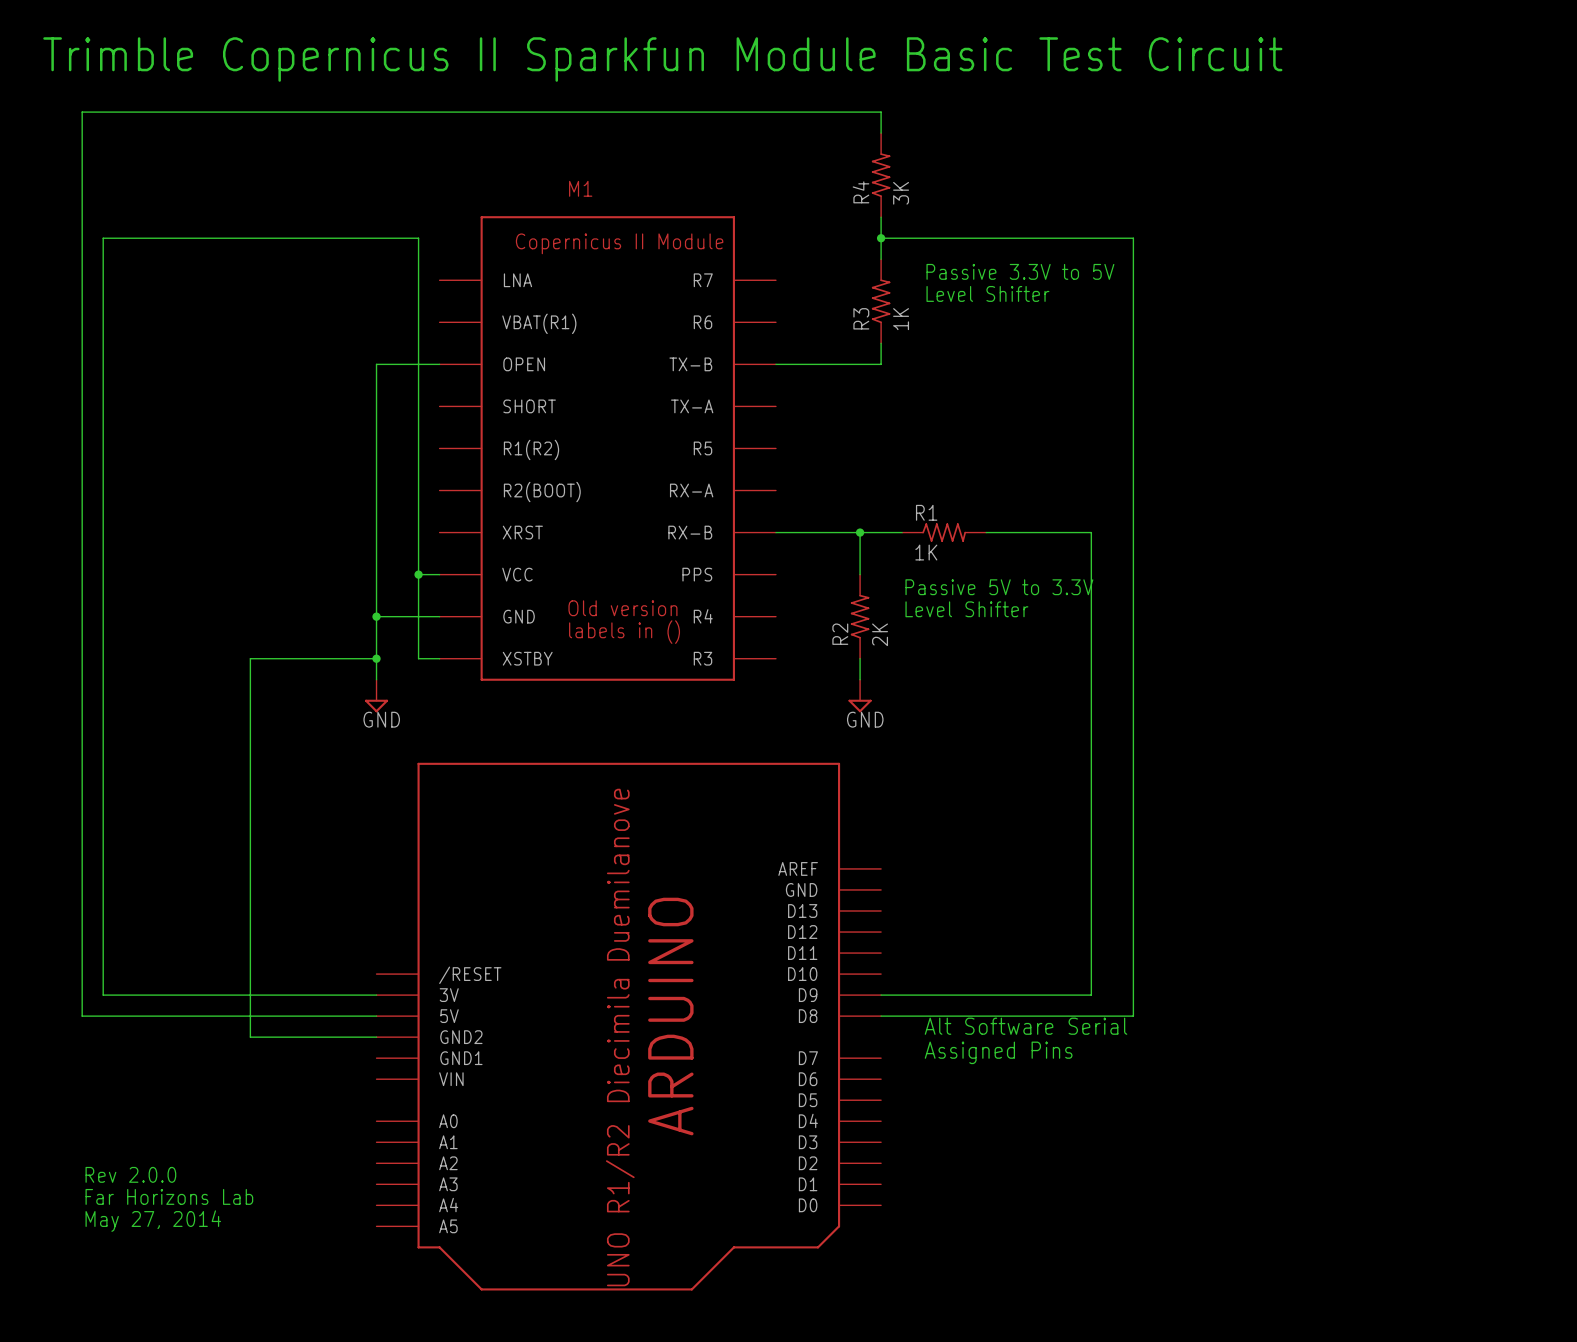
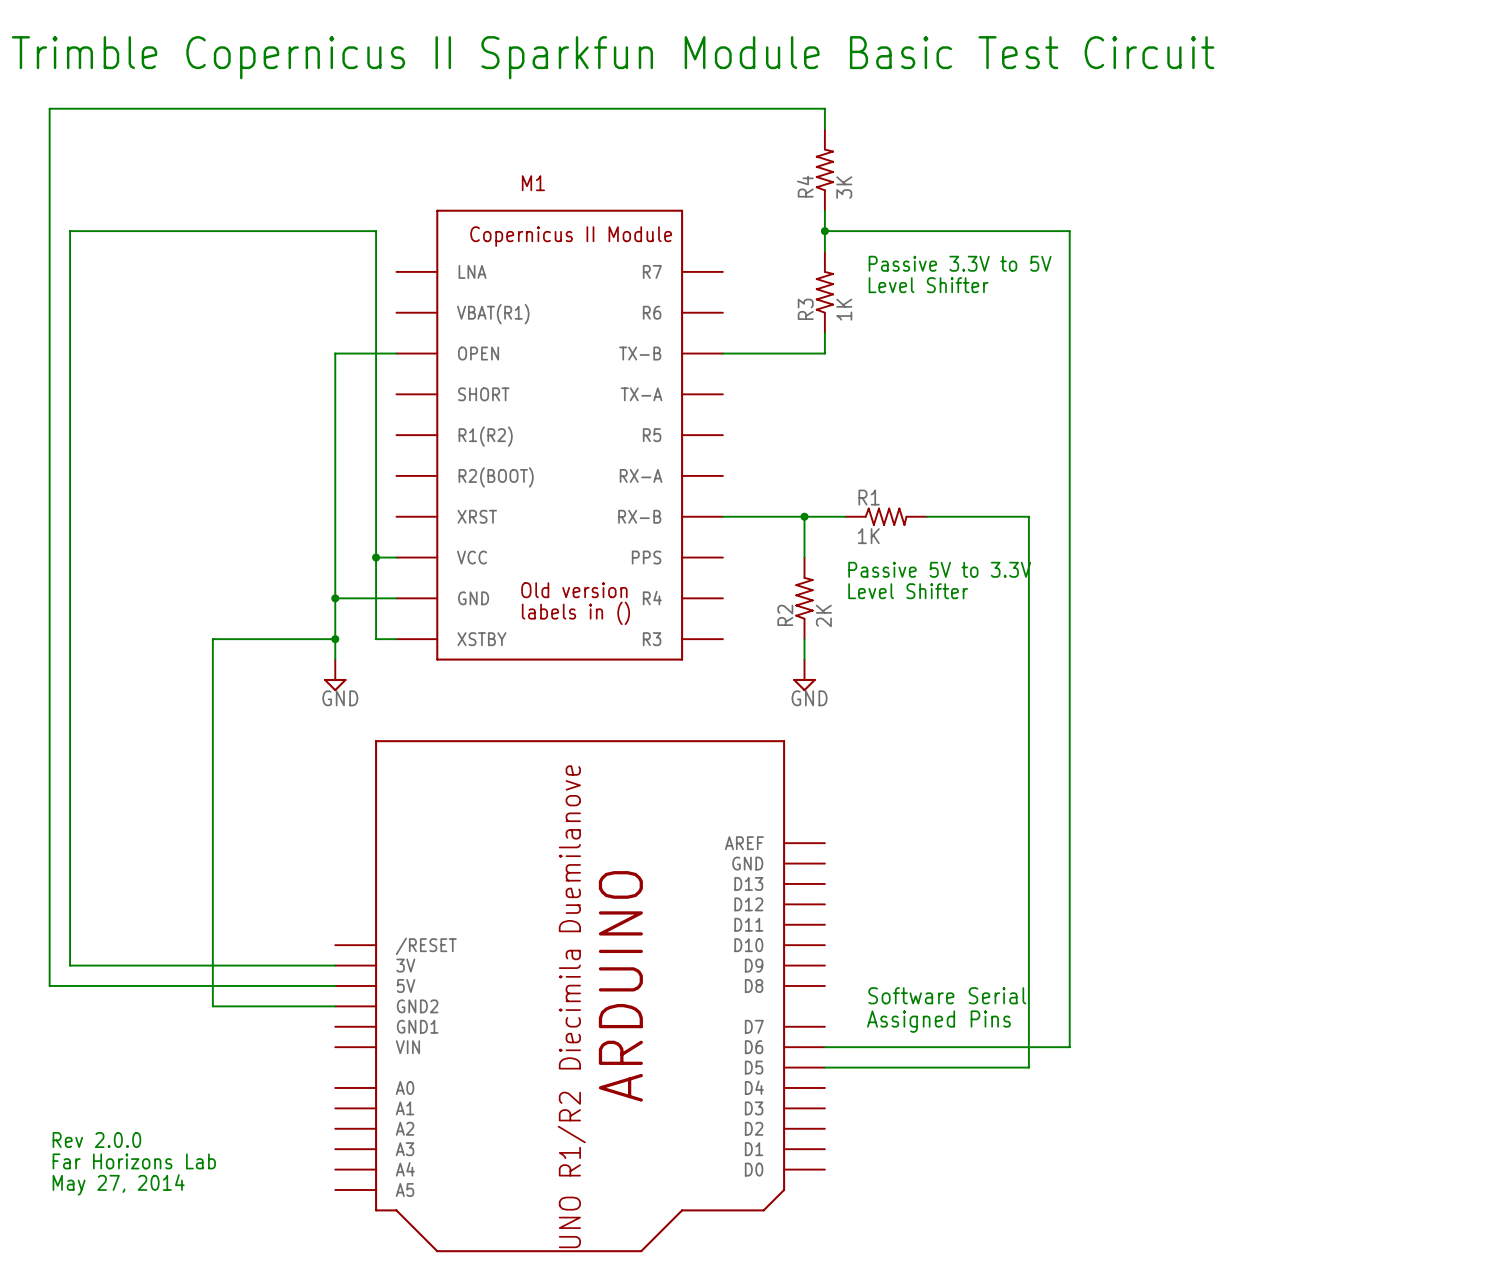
wire: (881, 995) (1091, 995) -> (824, 1067) (1028, 1067) (1028, 965)
wire: (881, 1016) (1133, 1016) -> (824, 1047) (1069, 1047) (1069, 985)
text: Alt Software Serial (1026, 1026) -> Software Serial (947, 995)

